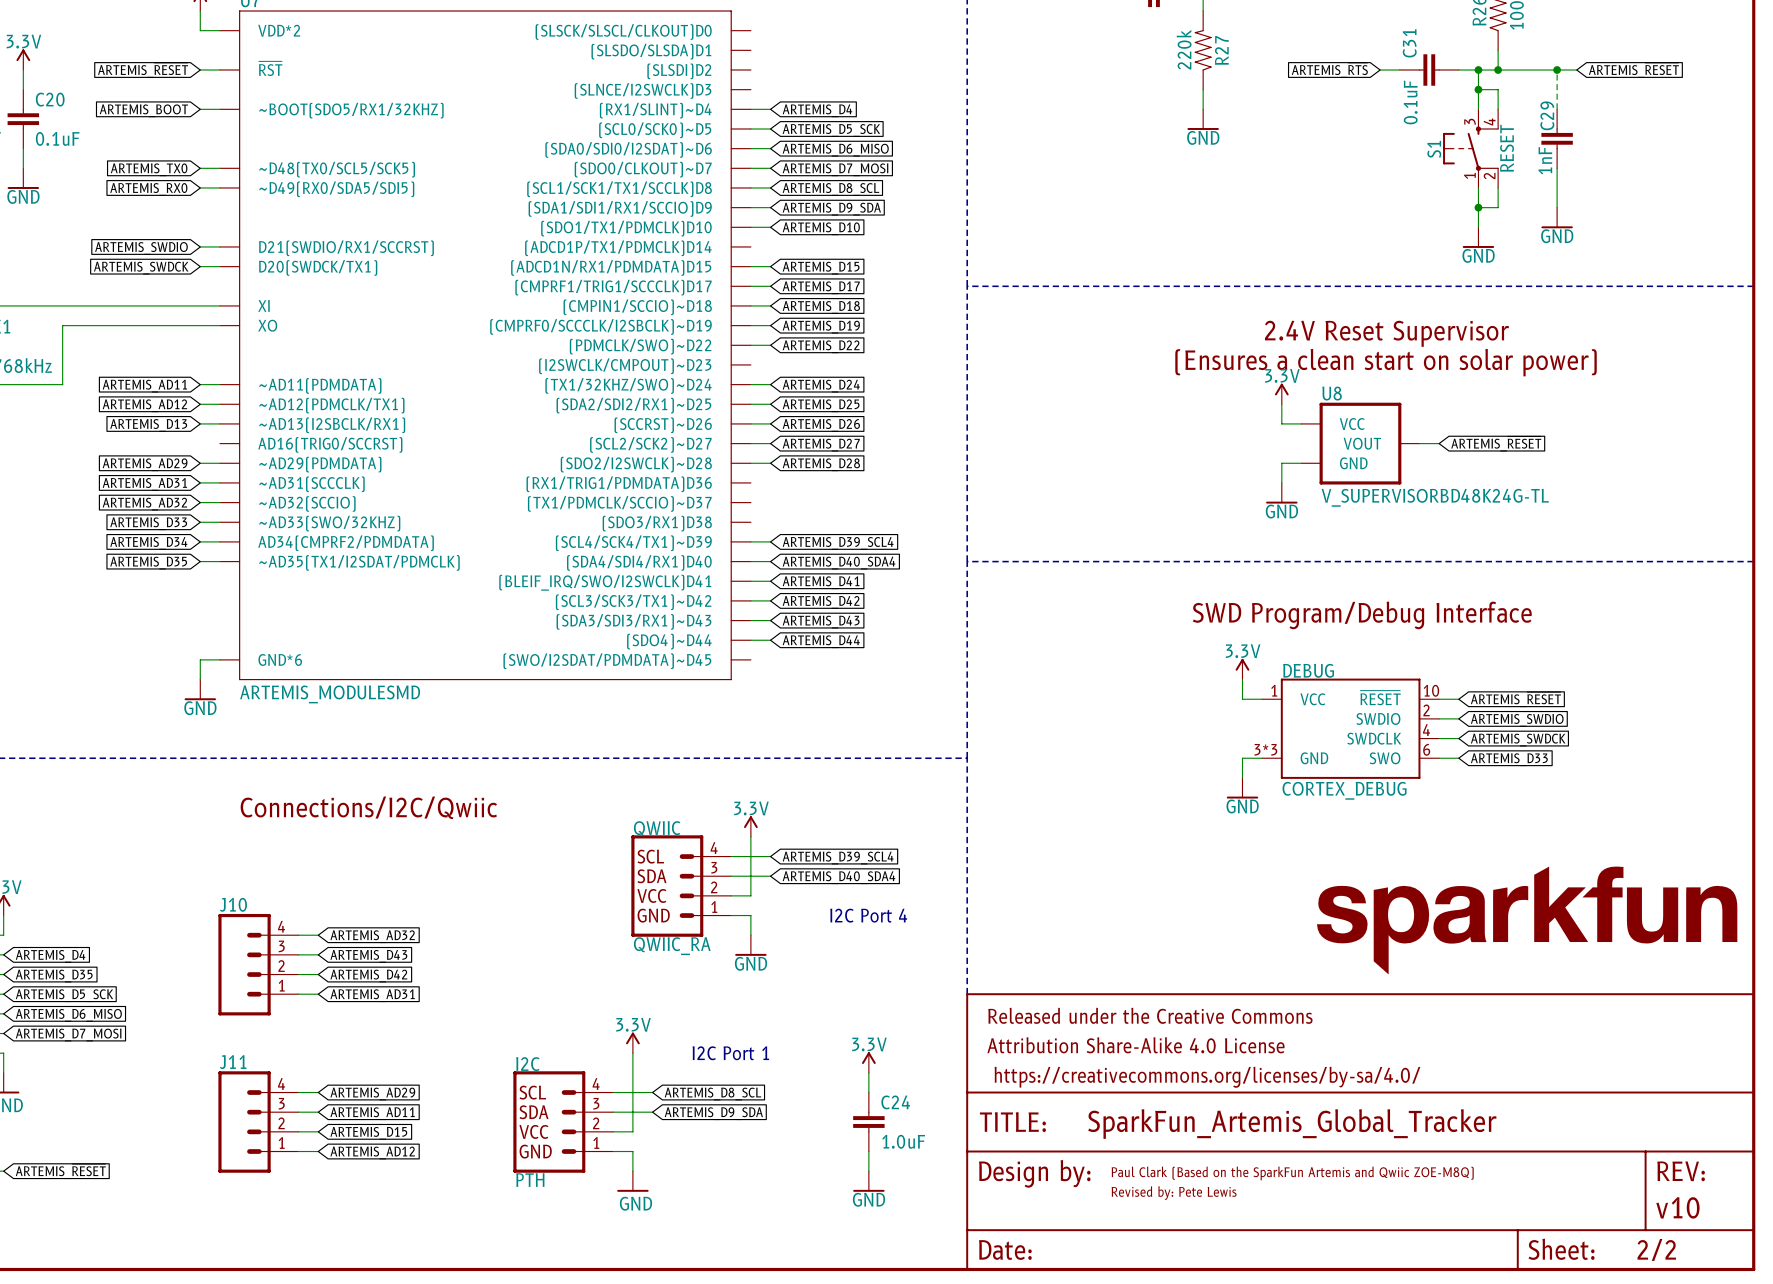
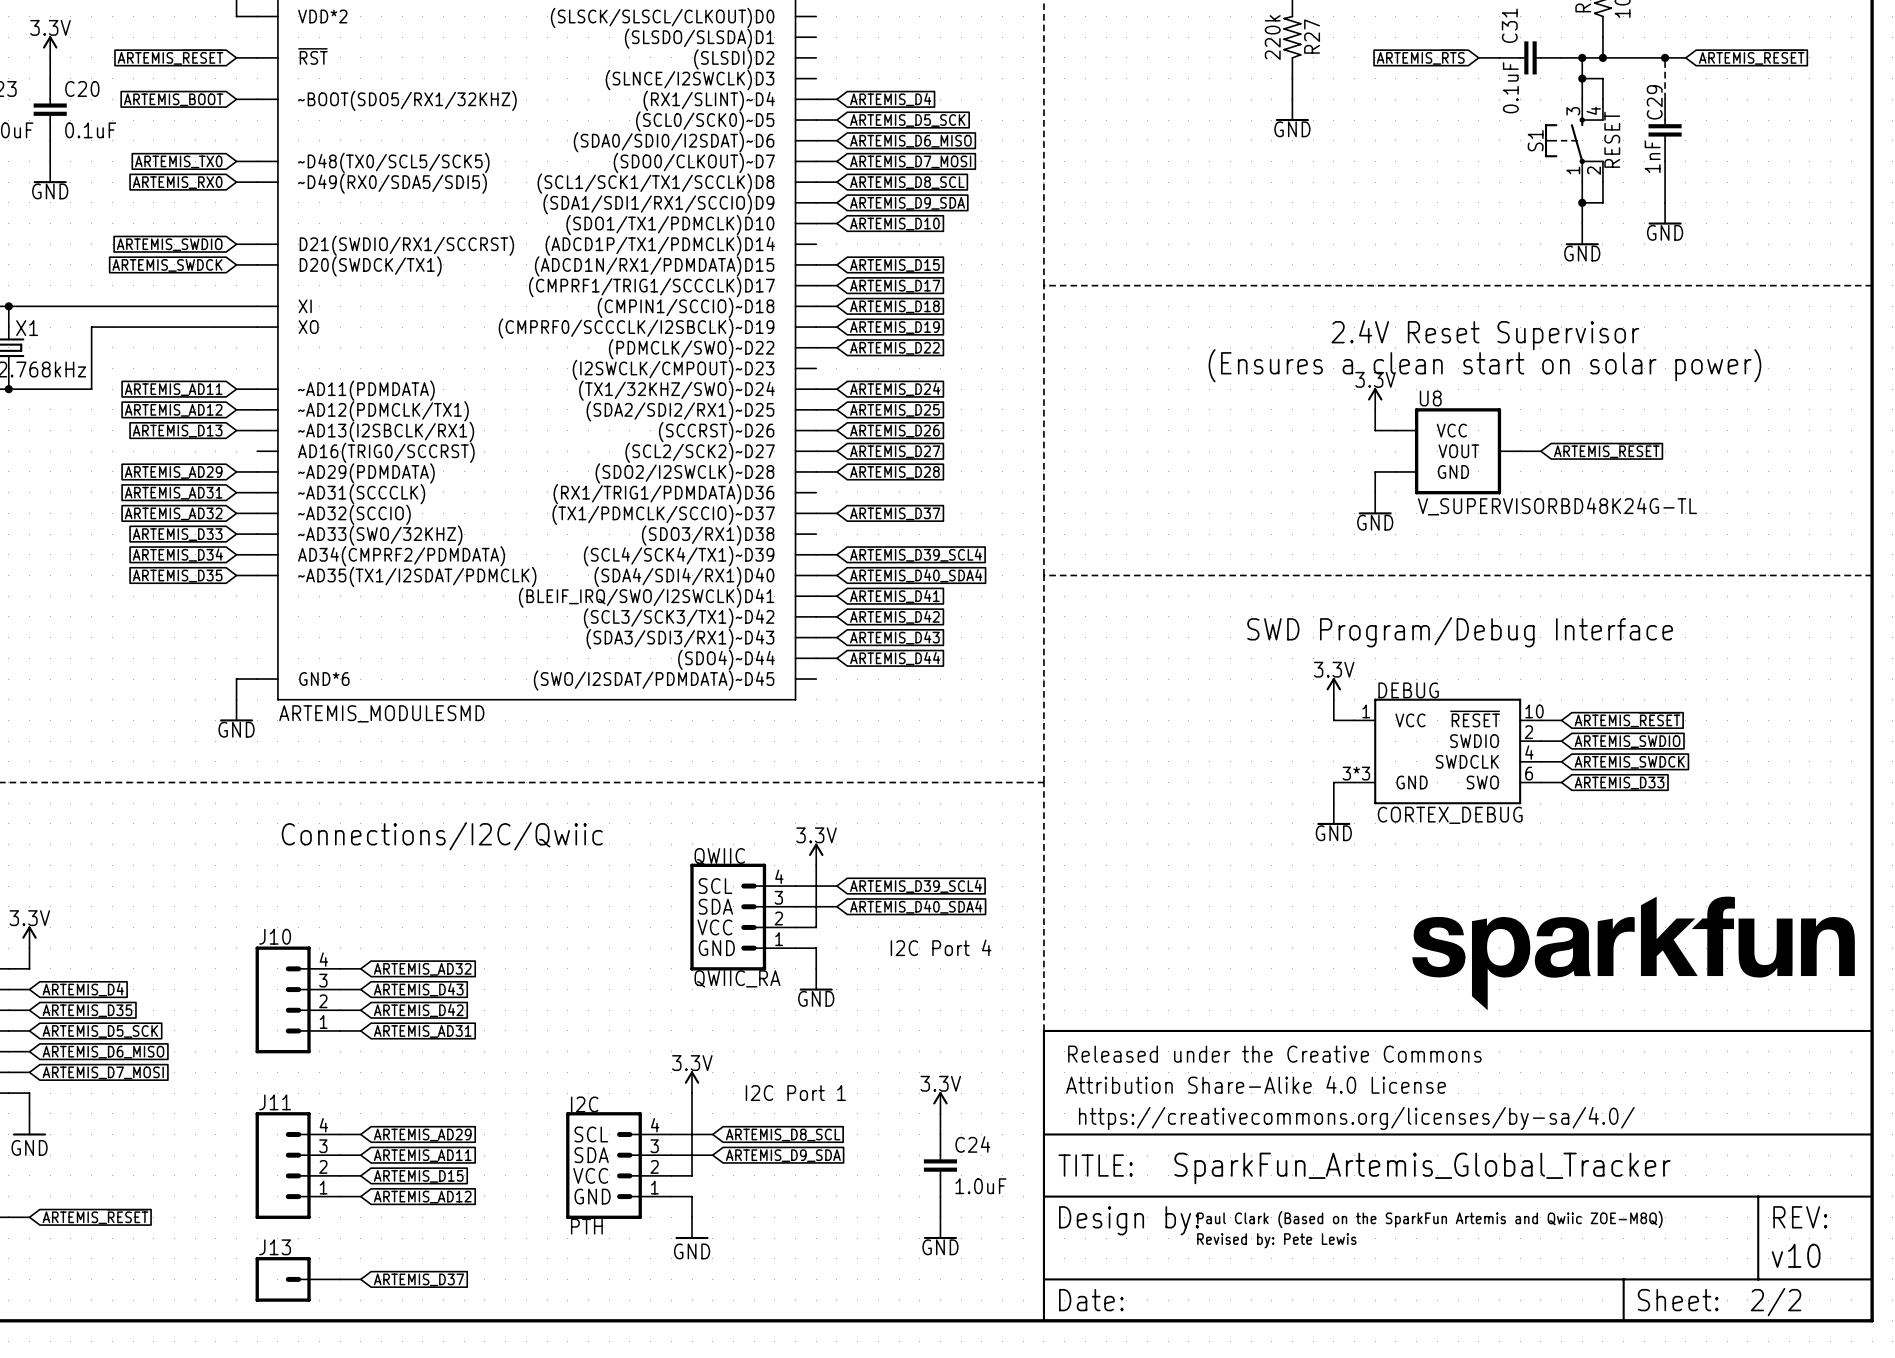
wire: none -> (816, 513) (836, 513)
global label: none -> ARTEMIS_D37 (895, 513)
J13: none -> (297, 1279)
wire: none -> (340, 1279) (360, 1279)
global label: none -> ARTEMIS_D37 (418, 1279)

